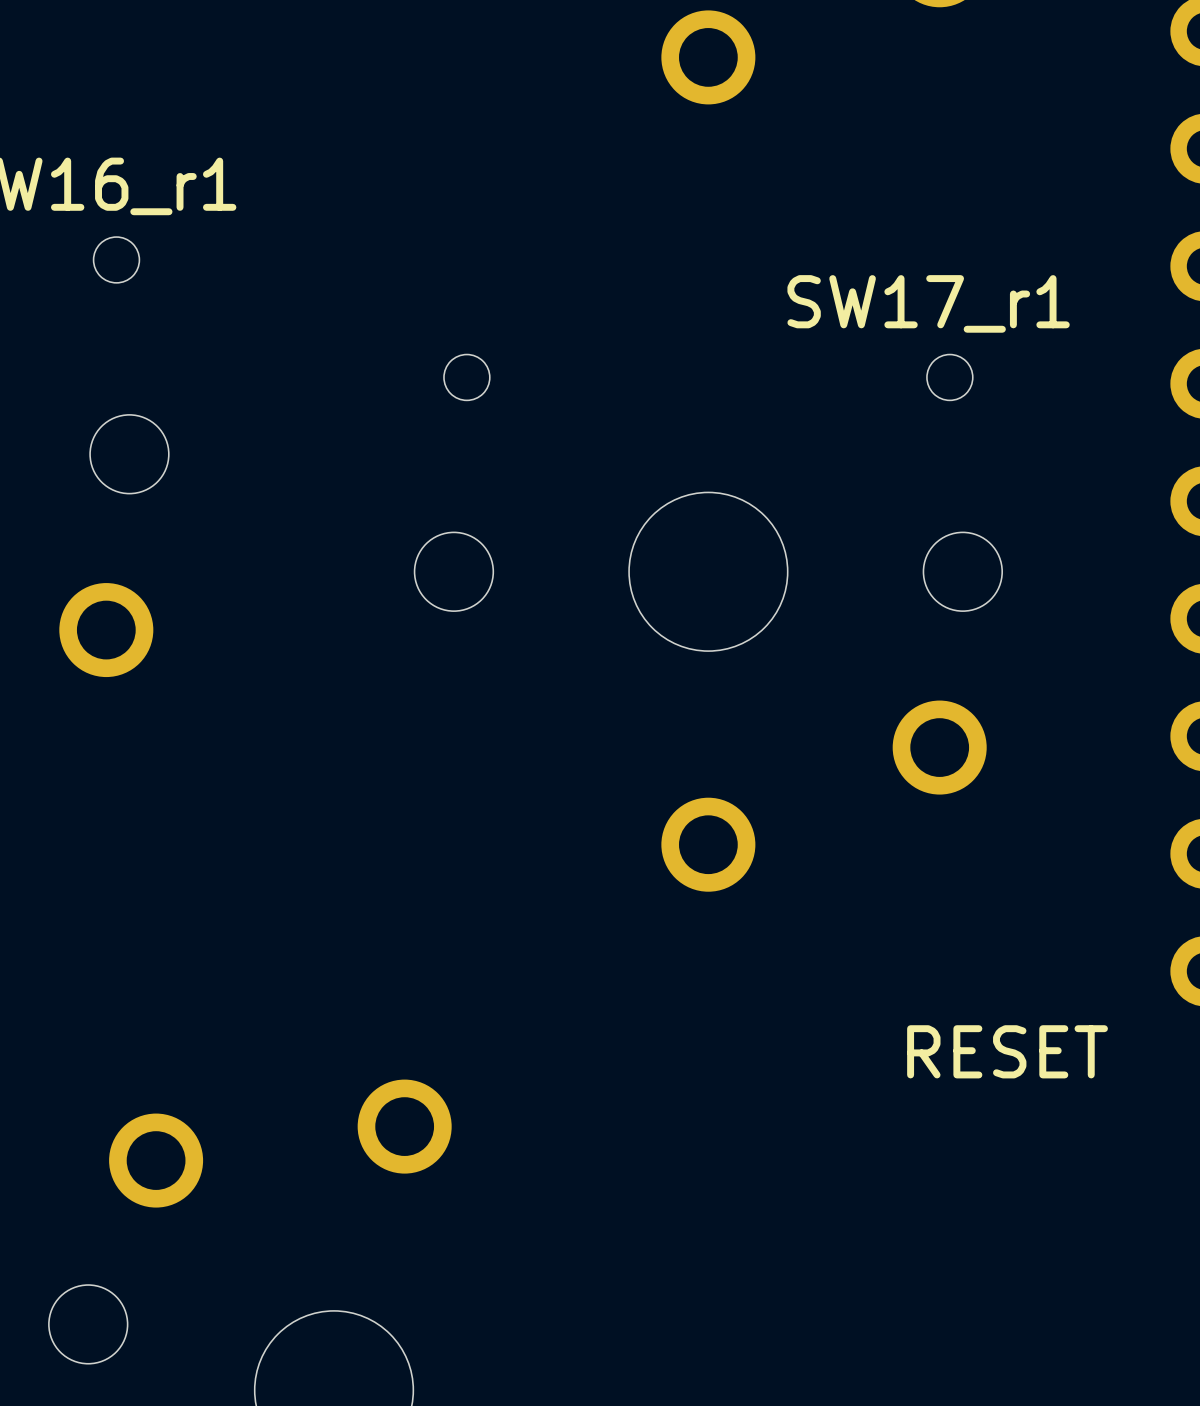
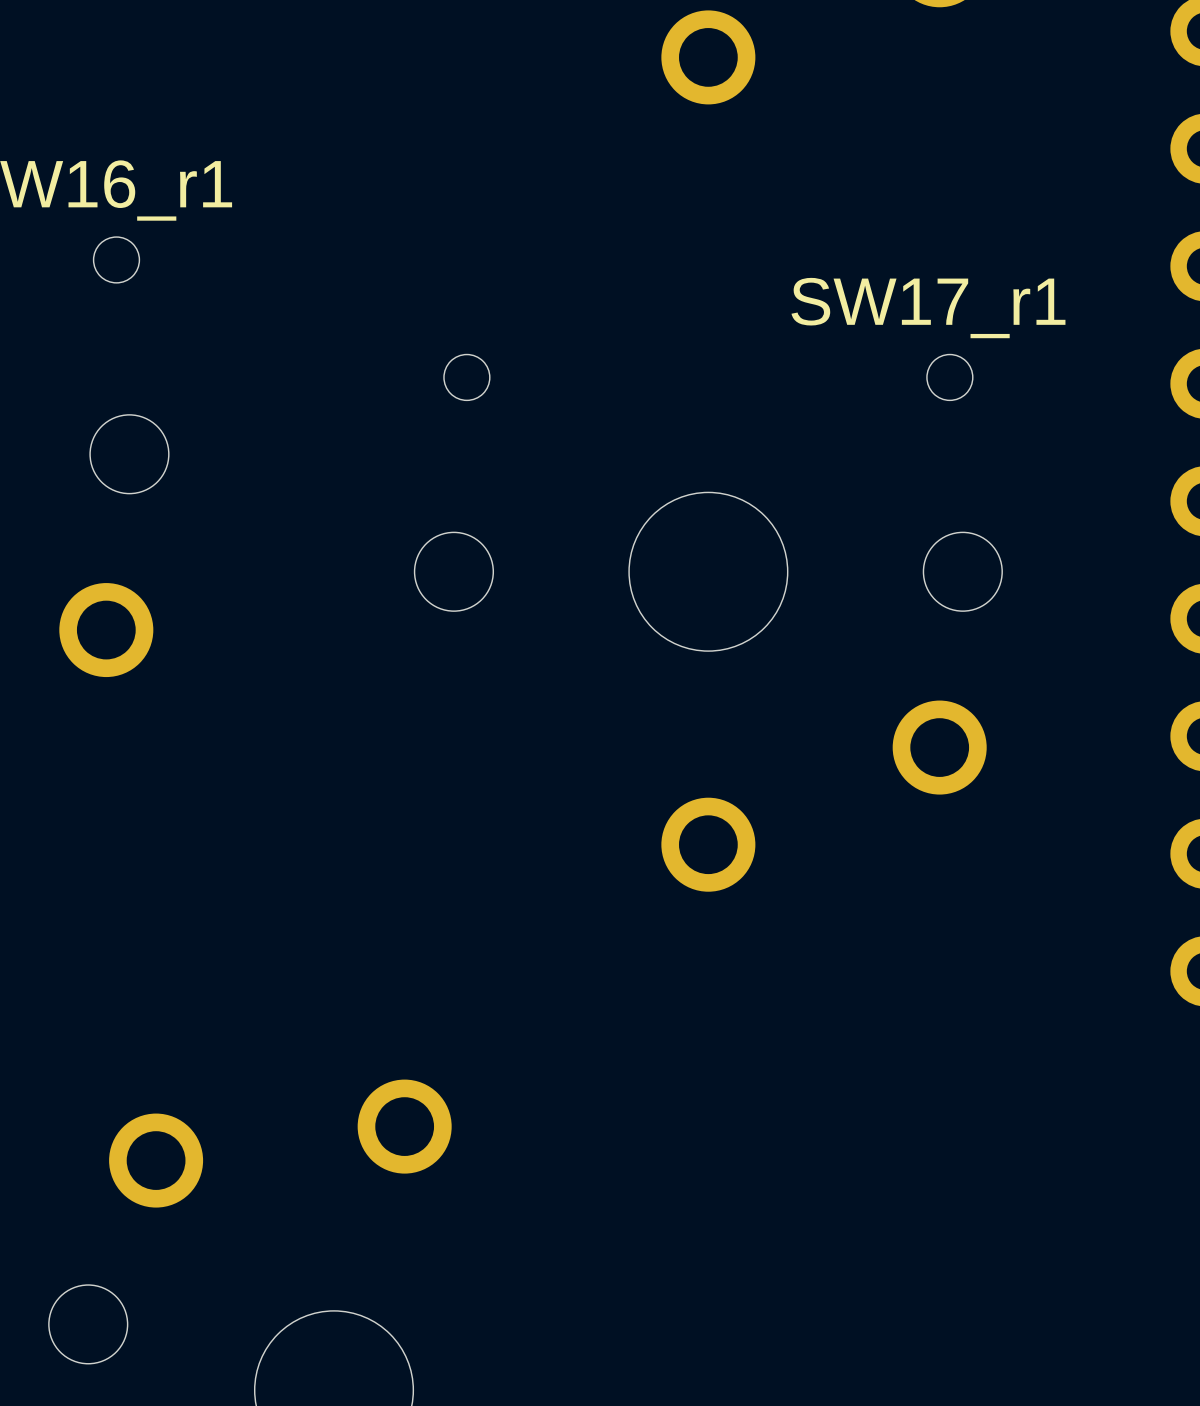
part: (1007, 1051) -> none

